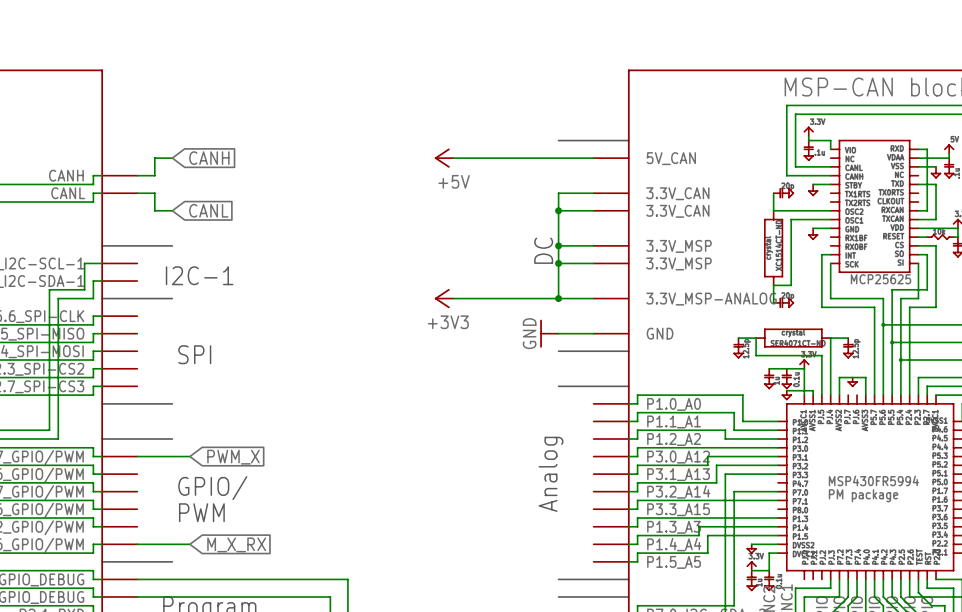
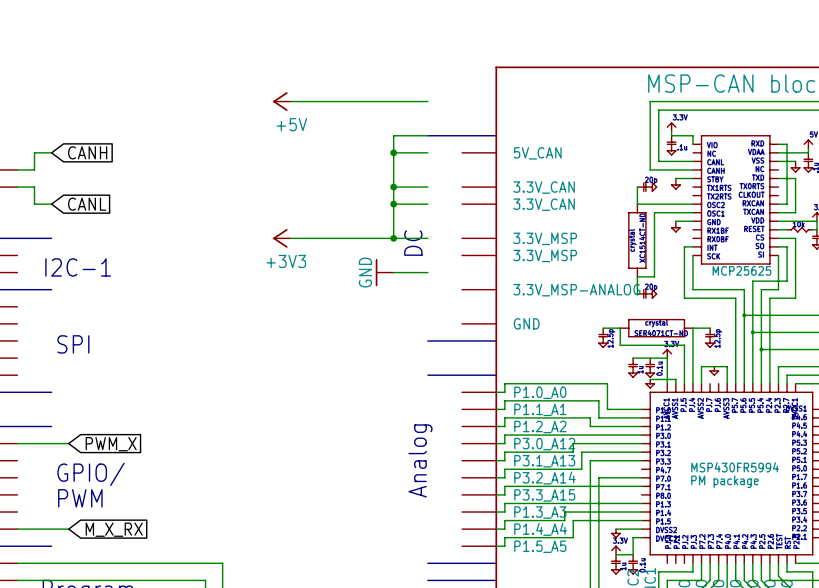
wire: none -> (291, 101) (427, 101)
power symbol position: +5V (444, 158) -> +5V (282, 101)
wire: (453, 158) (523, 158) -> none
junction: none -> (393, 152)
wire: (558, 158) (593, 158) -> (393, 187) (427, 187)
junction: none -> (393, 187)
wire: (593, 193) (558, 193) (558, 298) -> (427, 135) (393, 135) (393, 238)
junction: none -> (393, 204)
wire: (558, 210) (593, 210) -> (427, 204) (393, 204)
junction: (558, 210) -> none
junction: none -> (393, 238)
wire: (558, 245) (593, 245) -> (427, 238) (291, 238)
junction: (558, 245) -> none
wire: (558, 263) (593, 263) -> none
junction: (558, 263) -> none
power symbol position: +3V3 (444, 298) -> +3V3 (282, 238)
wire: (453, 298) (593, 298) -> none
junction: (558, 298) -> none
power symbol position: GND (549, 333) -> GND (384, 272)
wire: (558, 333) (593, 333) -> (393, 272) (427, 272)

